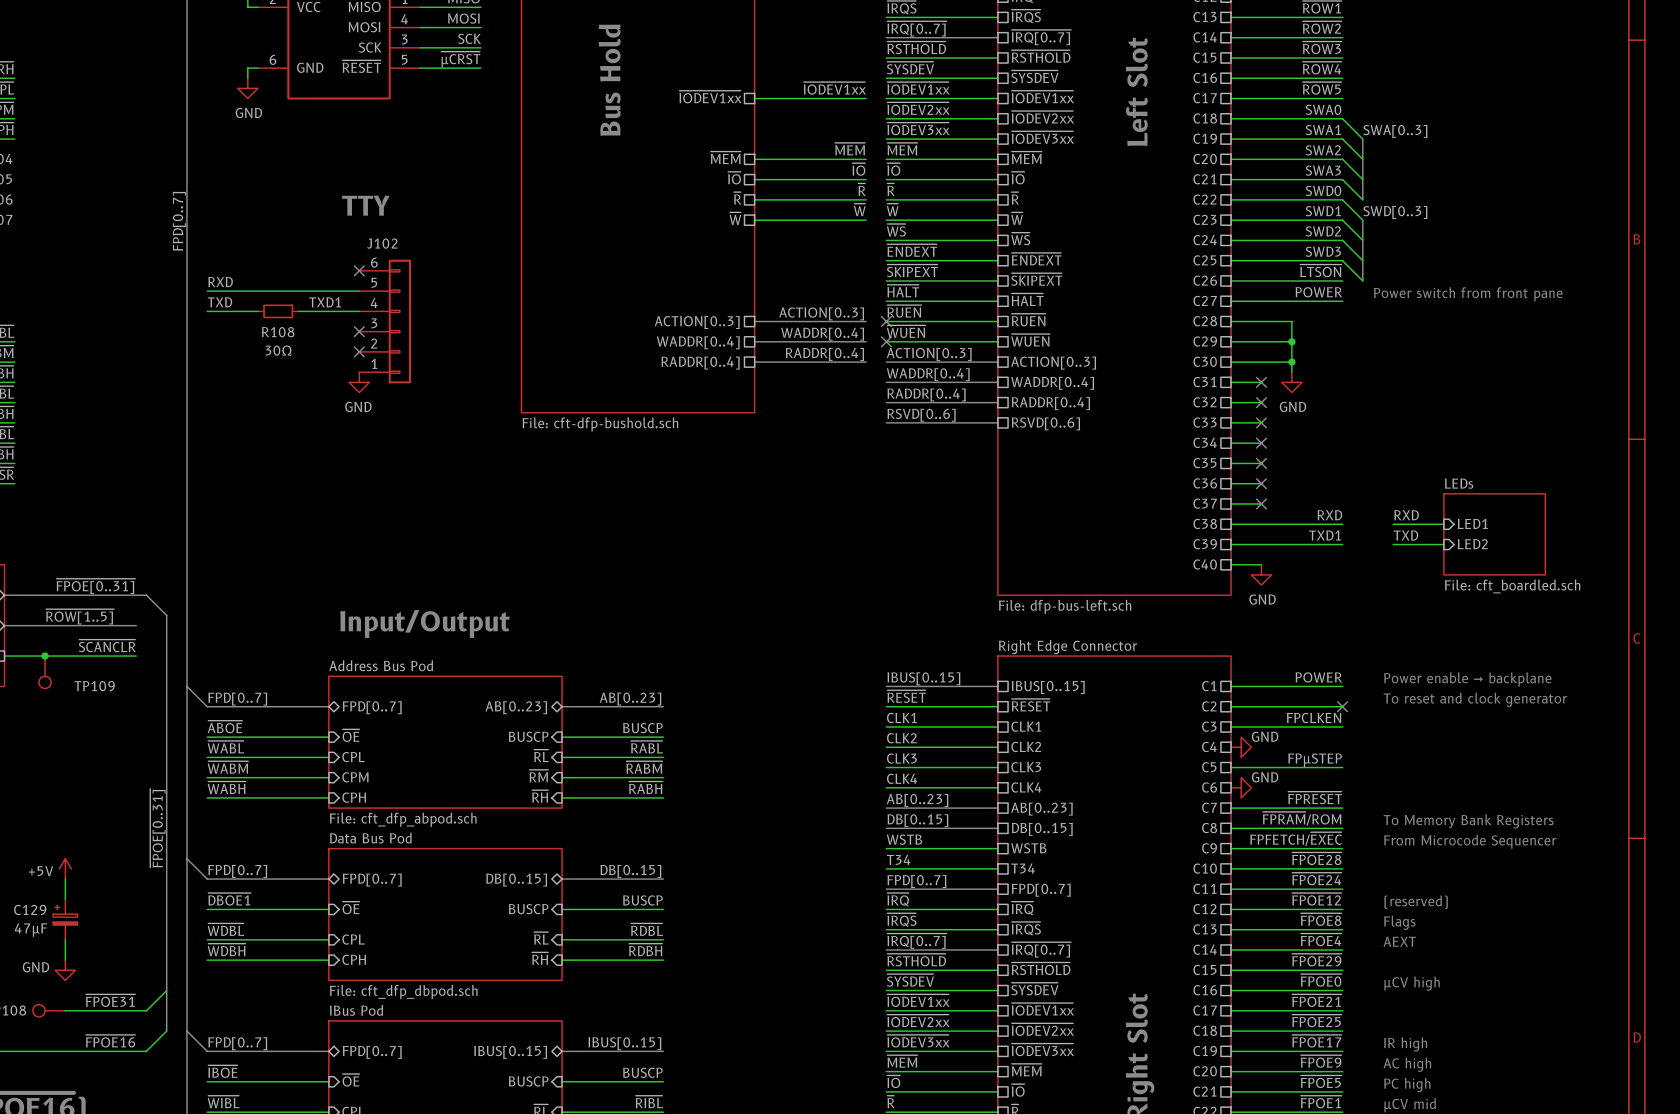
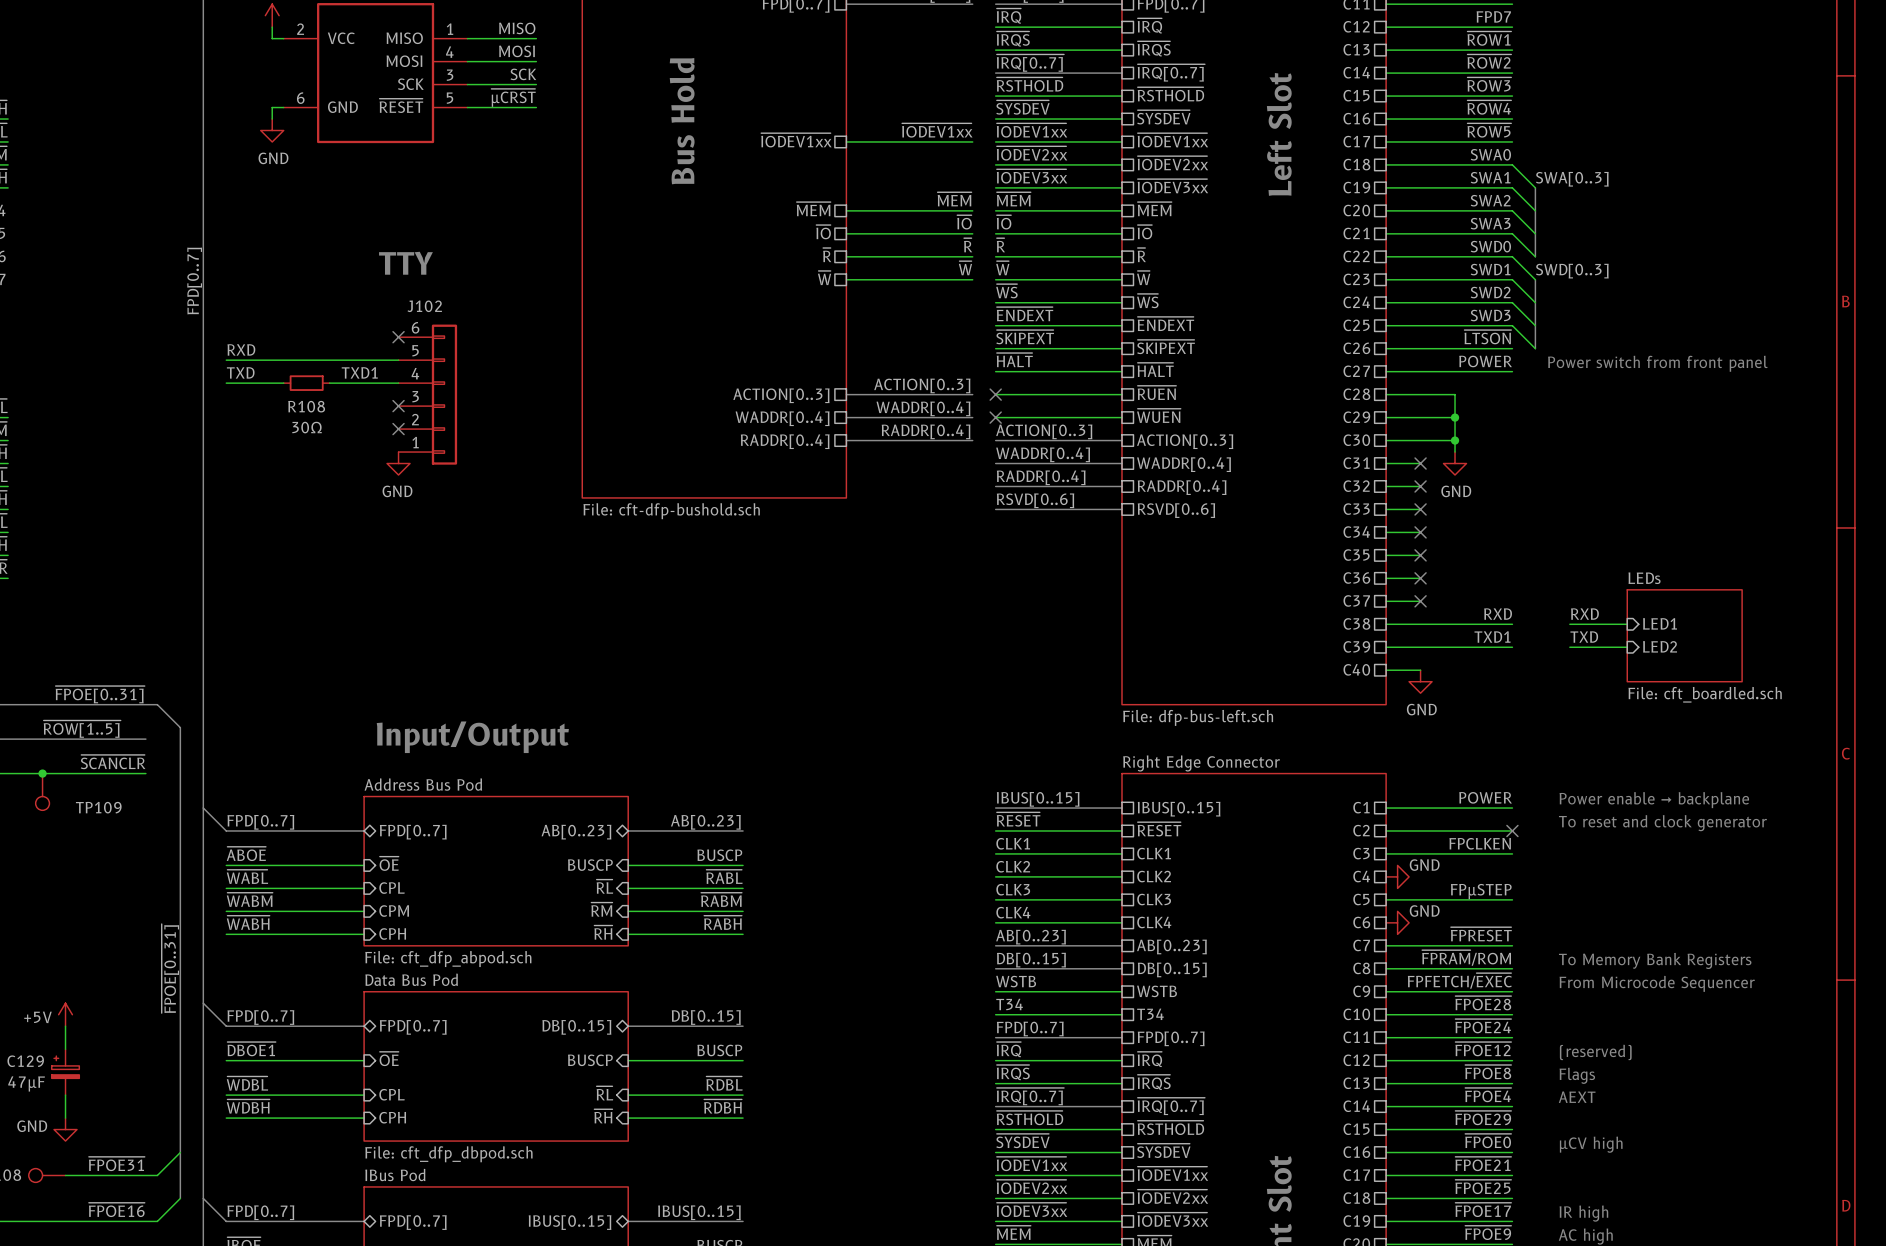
text: Power switch from front pane (1468, 294) -> Power switch from front panel (1657, 363)
label: ~{RUEN} (904, 311) -> none
label: ~{WUEN} (906, 331) -> none

